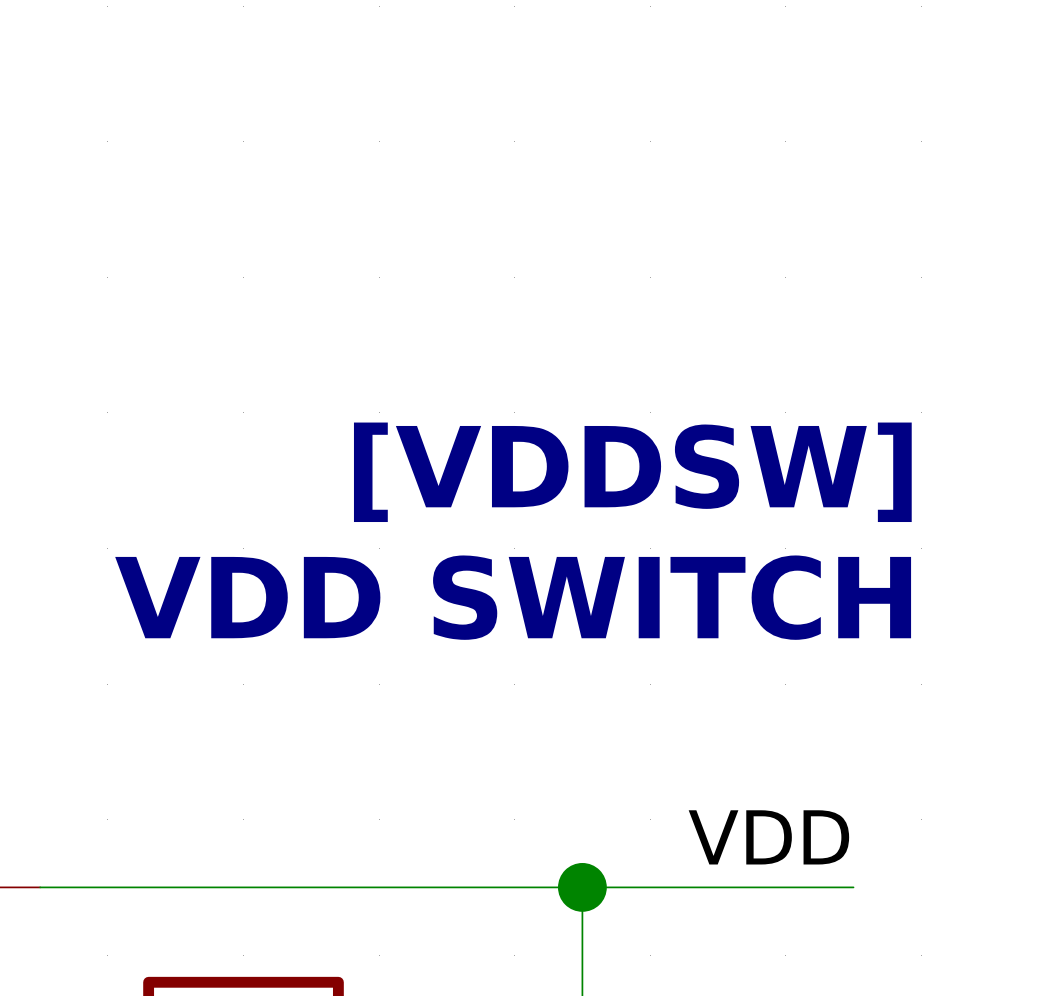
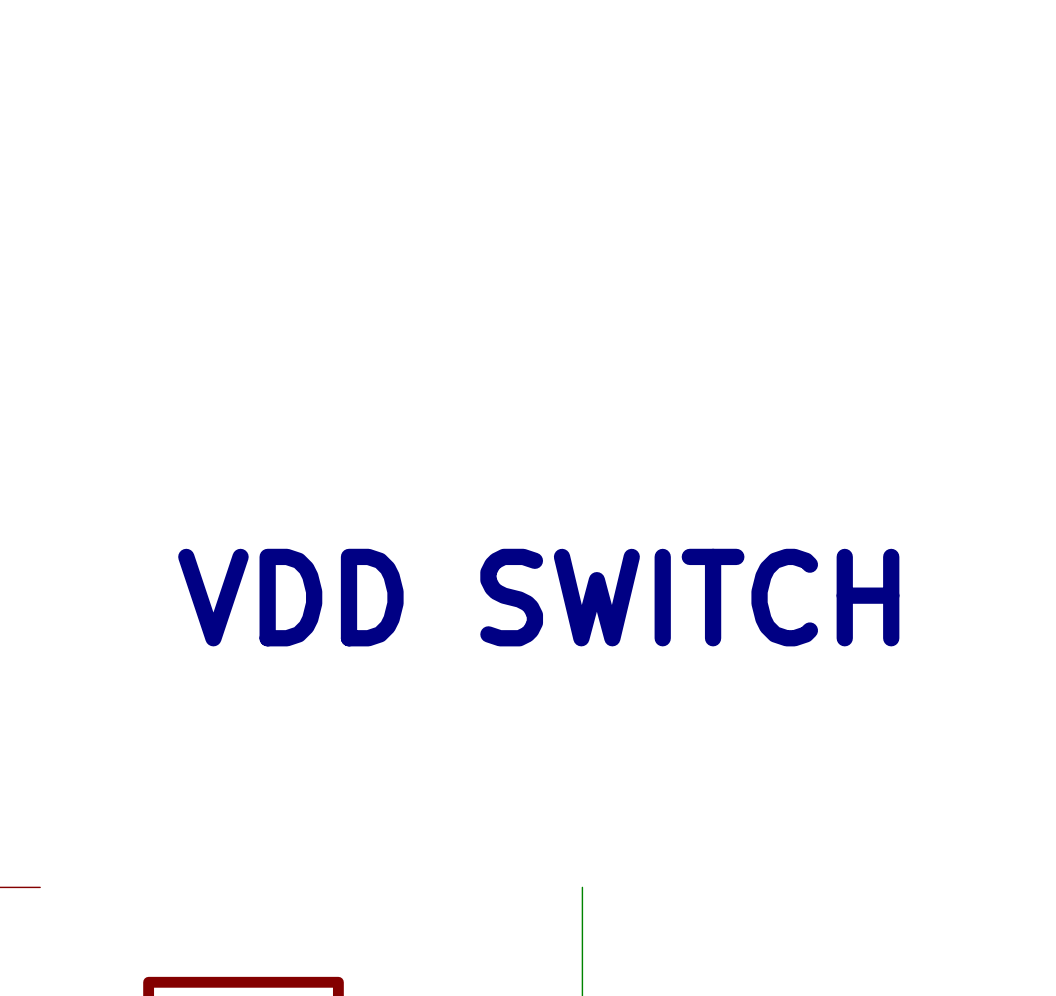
text: [VDDSW] (632, 472) -> none
label: VDD (768, 837) -> none
wire: (40, 887) (853, 887) -> none
junction: (582, 887) -> none

